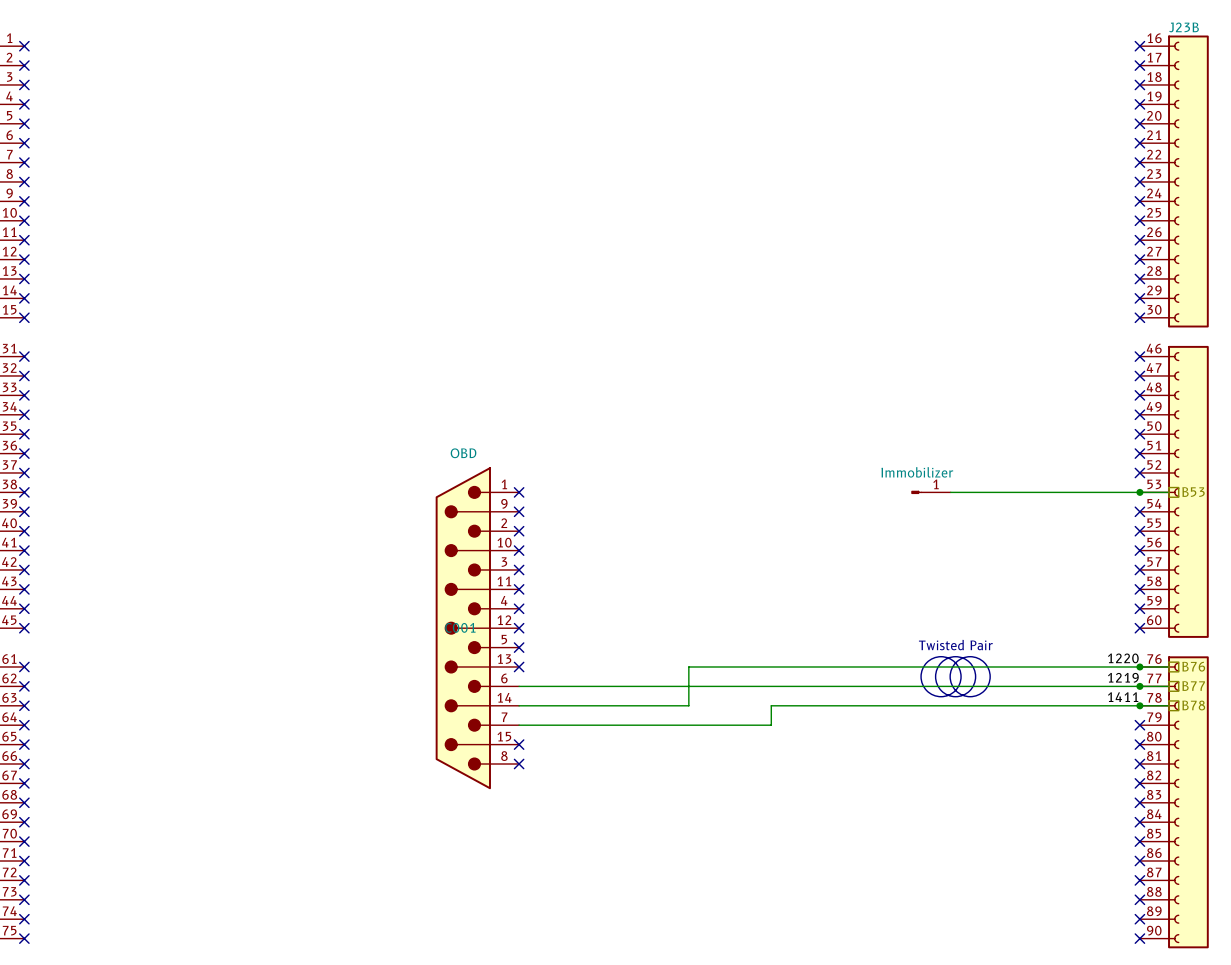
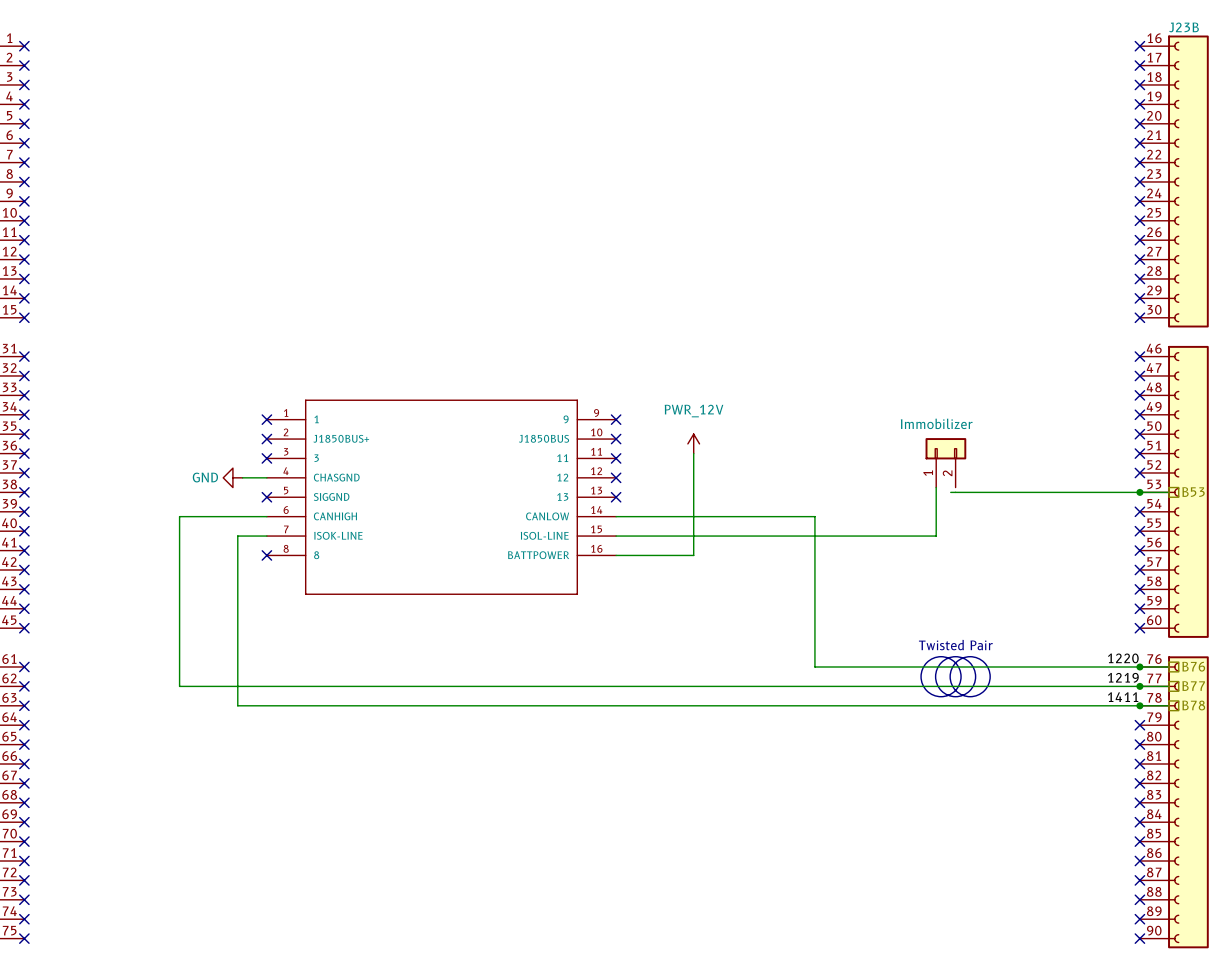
no-connect mark: none -> (266, 419)
no-connect mark: none -> (616, 419)
no-connect mark: none -> (266, 439)
no-connect mark: none -> (616, 439)
power symbol: none -> PWR_12V (693, 443)
wire: none -> (693, 453) (693, 555) (616, 555)
no-connect mark: none -> (266, 458)
no-connect mark: none -> (616, 458)
part: none -> Immobilizer (945, 462)
power symbol: none -> GND (232, 477)
wire: none -> (242, 477) (266, 477)
no-connect mark: none -> (616, 477)
wire: none -> (936, 487) (936, 536) (616, 536)
no-connect mark: (519, 492) -> none
part: Immobilizer (931, 492) -> none
no-connect mark: none -> (266, 497)
part: none -> (441, 497)
no-connect mark: none -> (616, 497)
no-connect mark: (519, 511) -> none
wire: none -> (266, 516) (179, 516) (179, 686) (519, 686)
wire: none -> (616, 516) (814, 516) (814, 666)
no-connect mark: (519, 531) -> none
wire: none -> (266, 536) (237, 536) (237, 705) (519, 705)
no-connect mark: (519, 550) -> none
no-connect mark: none -> (266, 555)
no-connect mark: (519, 569) -> none
no-connect mark: (519, 589) -> none
no-connect mark: (519, 608) -> none
part: OBD (477, 628) -> none
no-connect mark: (519, 628) -> none
no-connect mark: (519, 647) -> none
no-connect mark: (519, 666) -> none
wire: (814, 666) (688, 666) (688, 705) -> (771, 705) (688, 705)
wire: (771, 705) (771, 725) (519, 725) -> none
no-connect mark: (519, 744) -> none
no-connect mark: (519, 764) -> none

